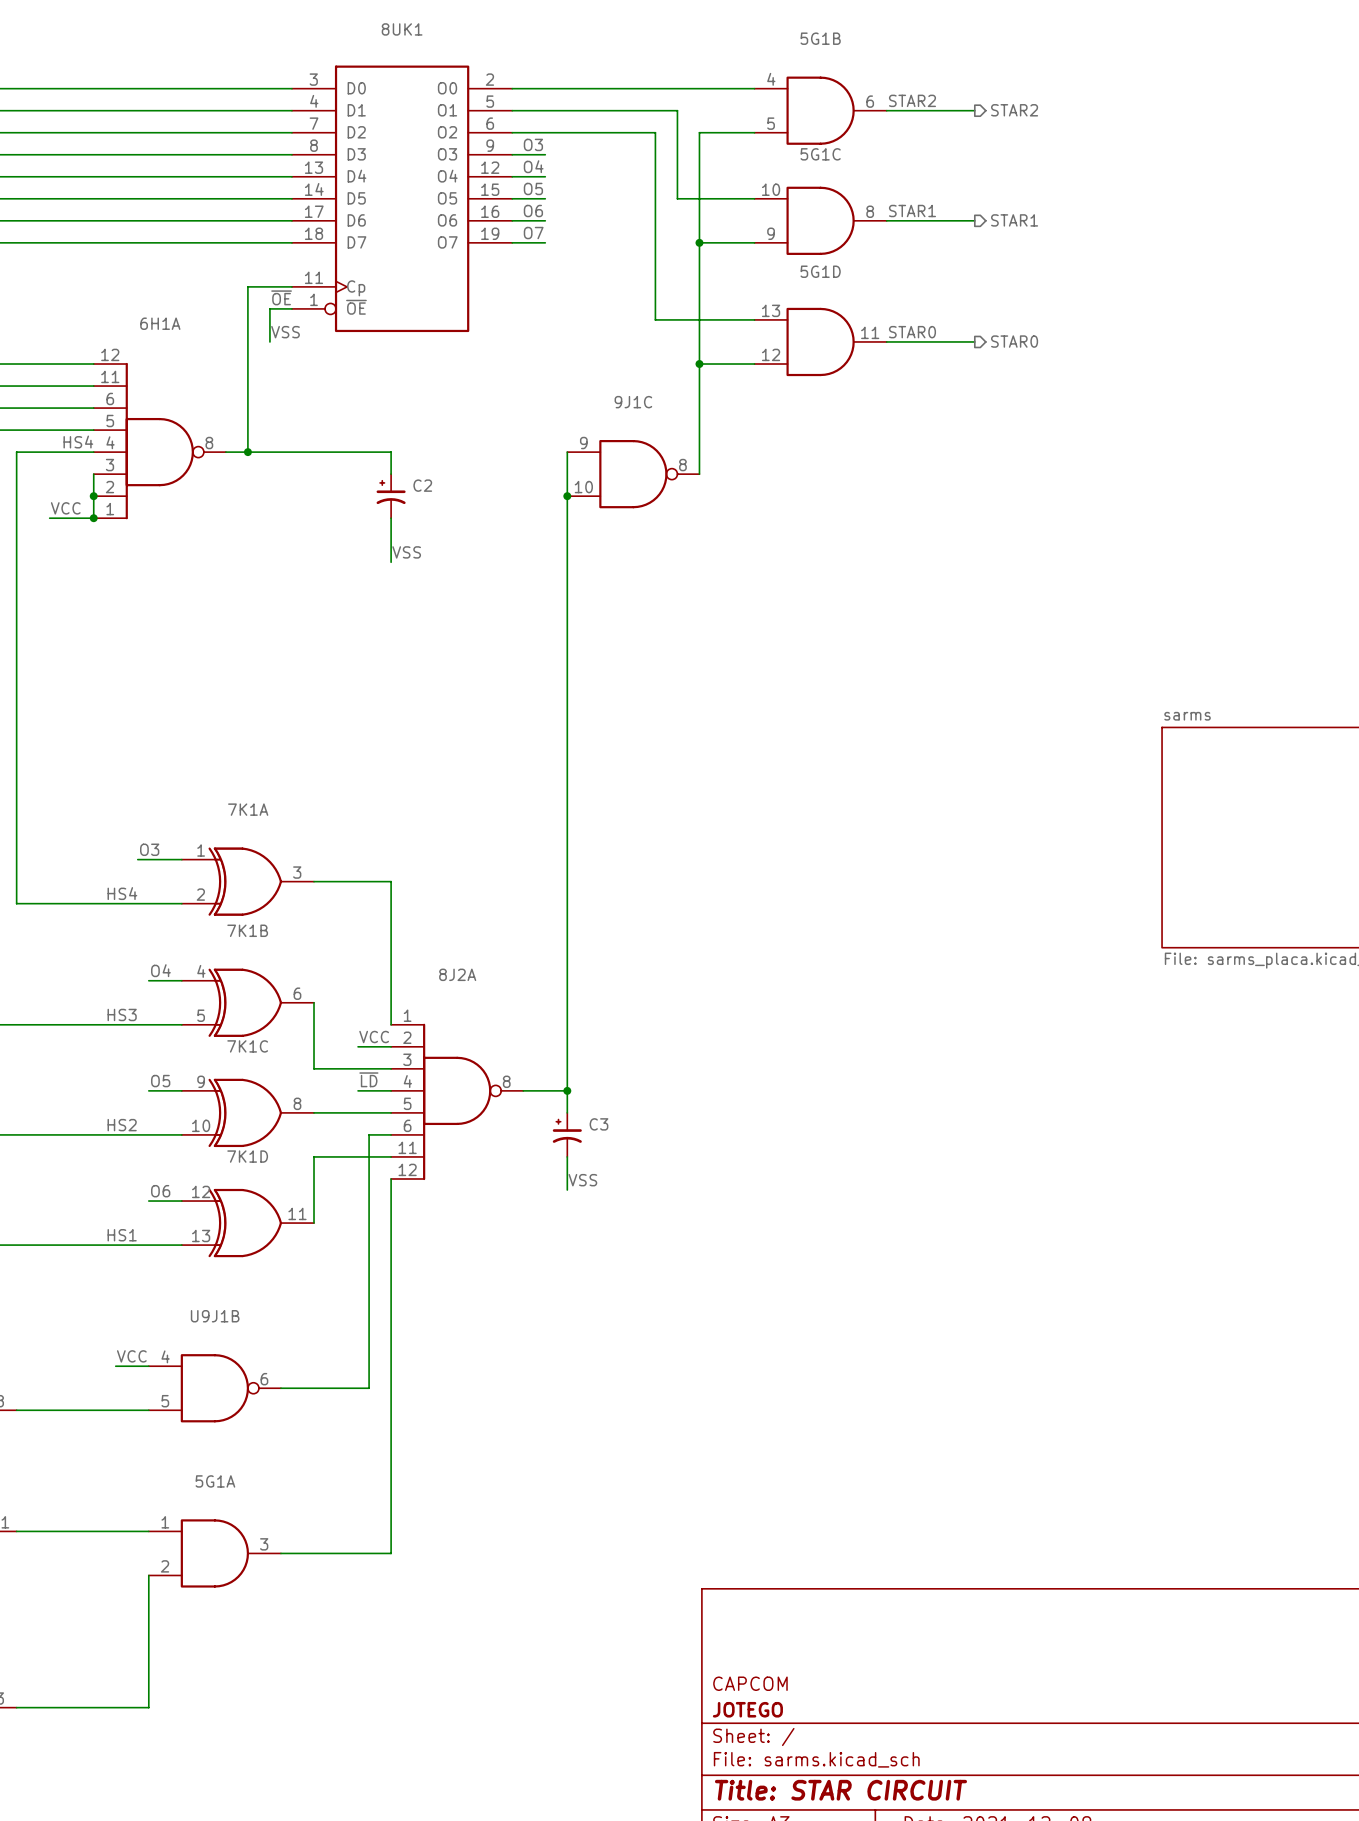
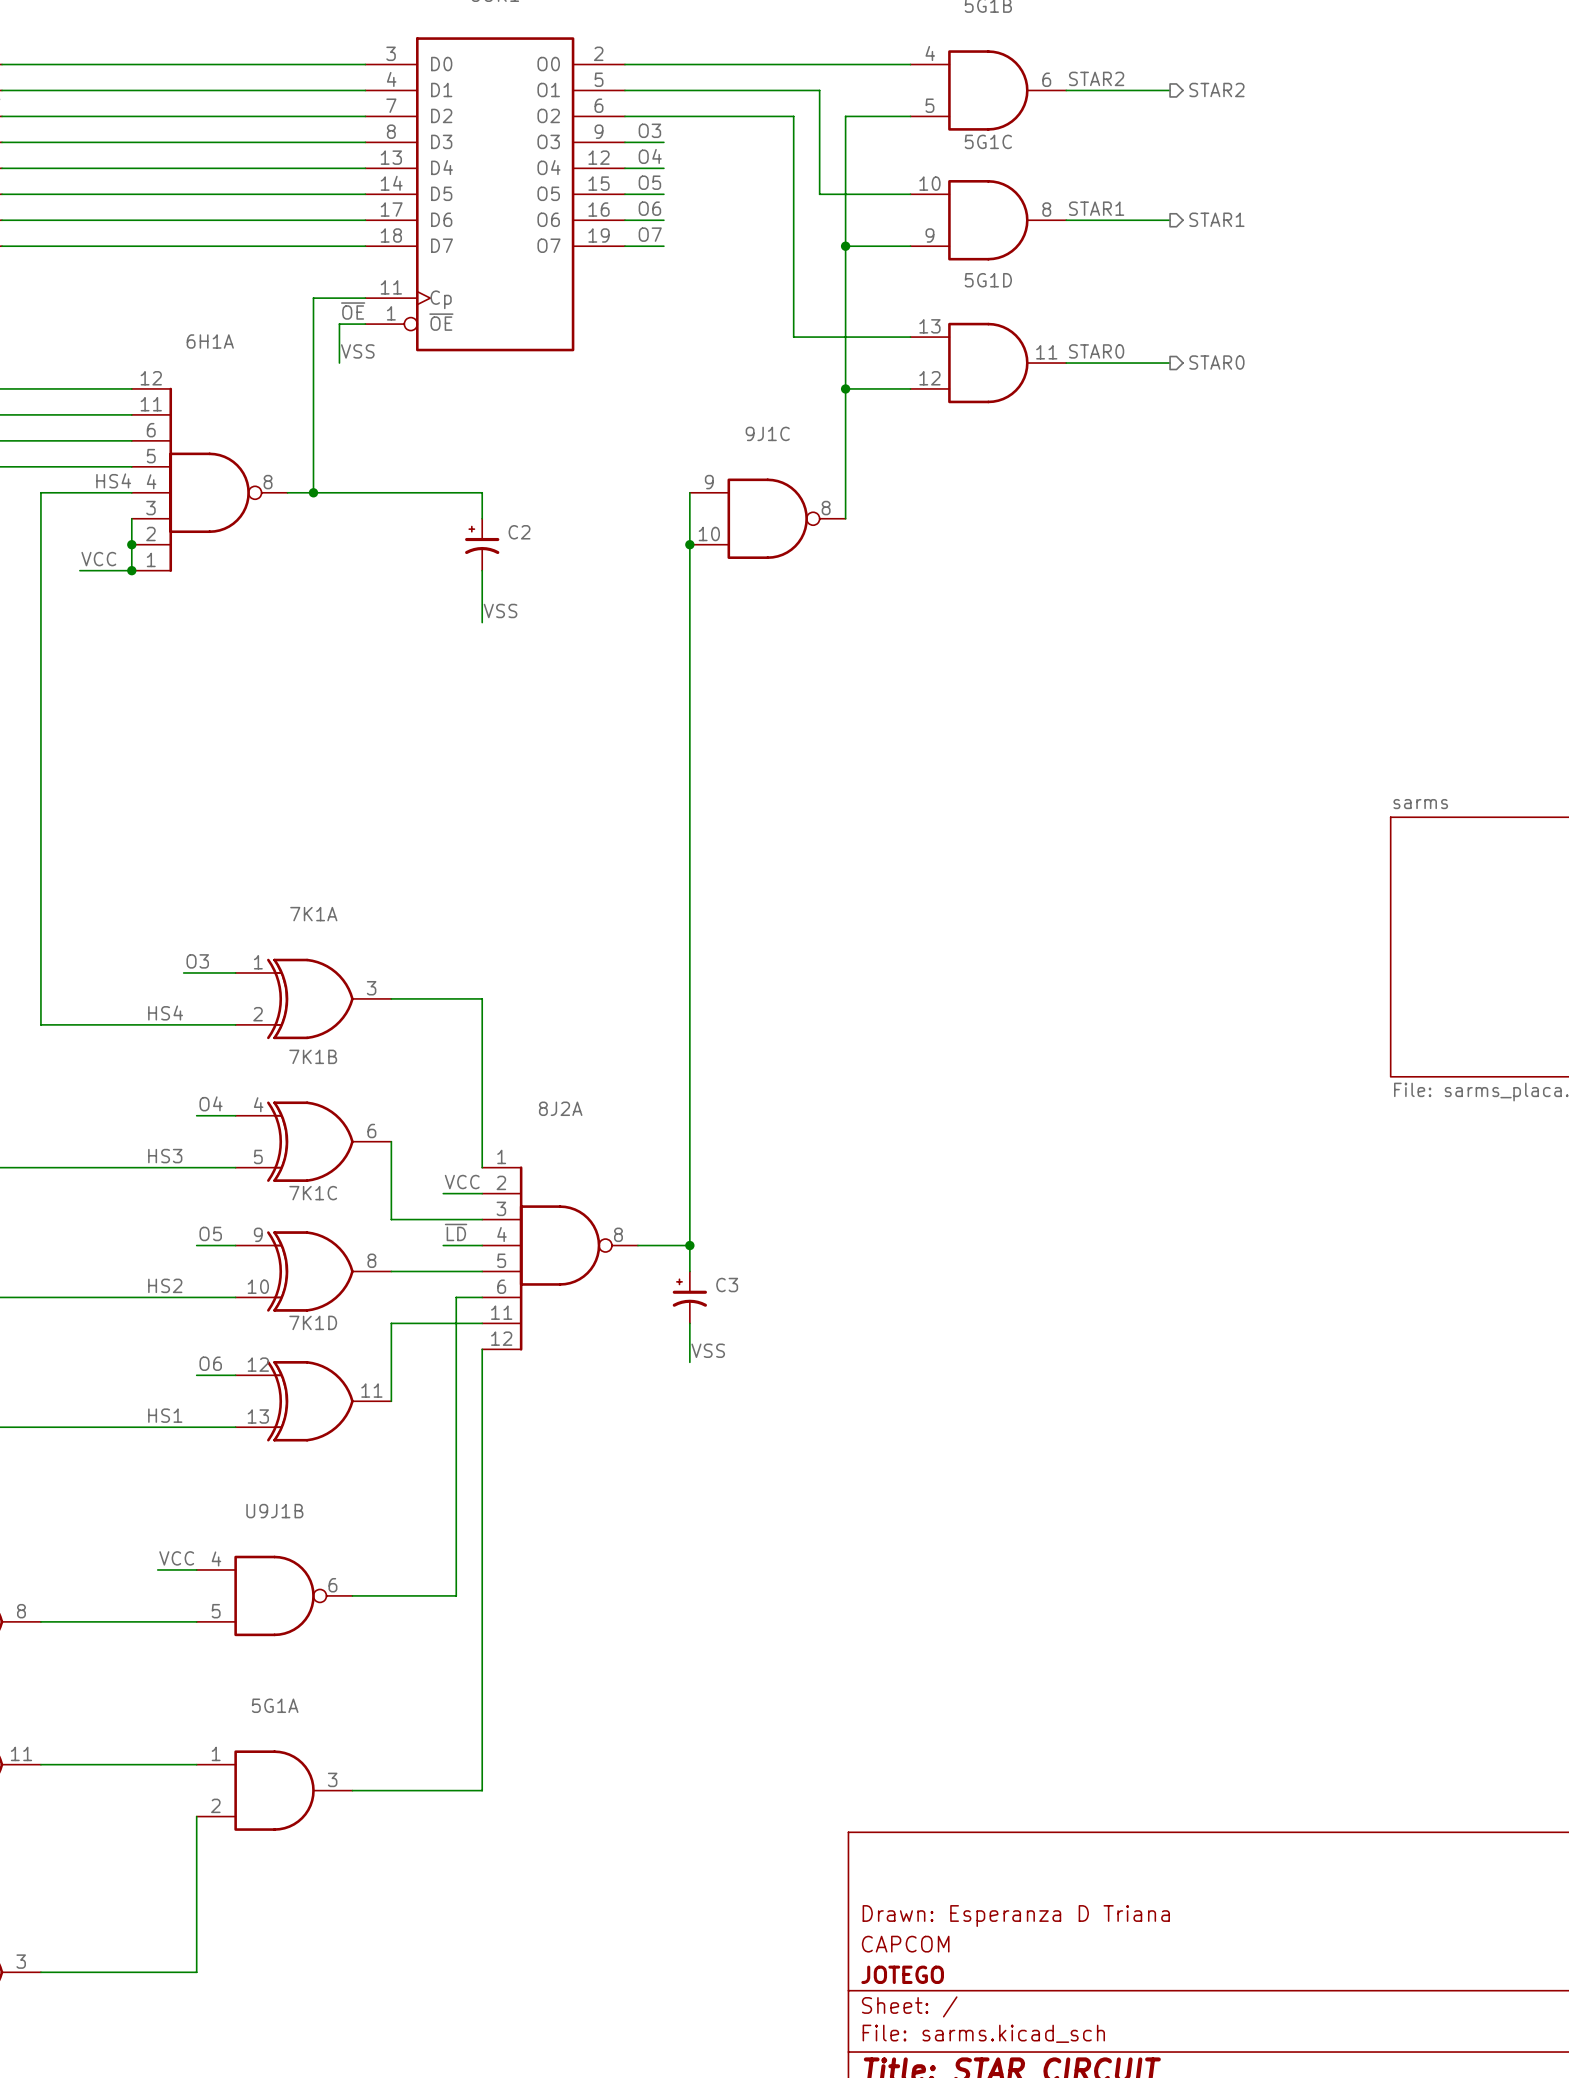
title block: none -> Drawn: Esperanza D Triana (1016, 1916)

